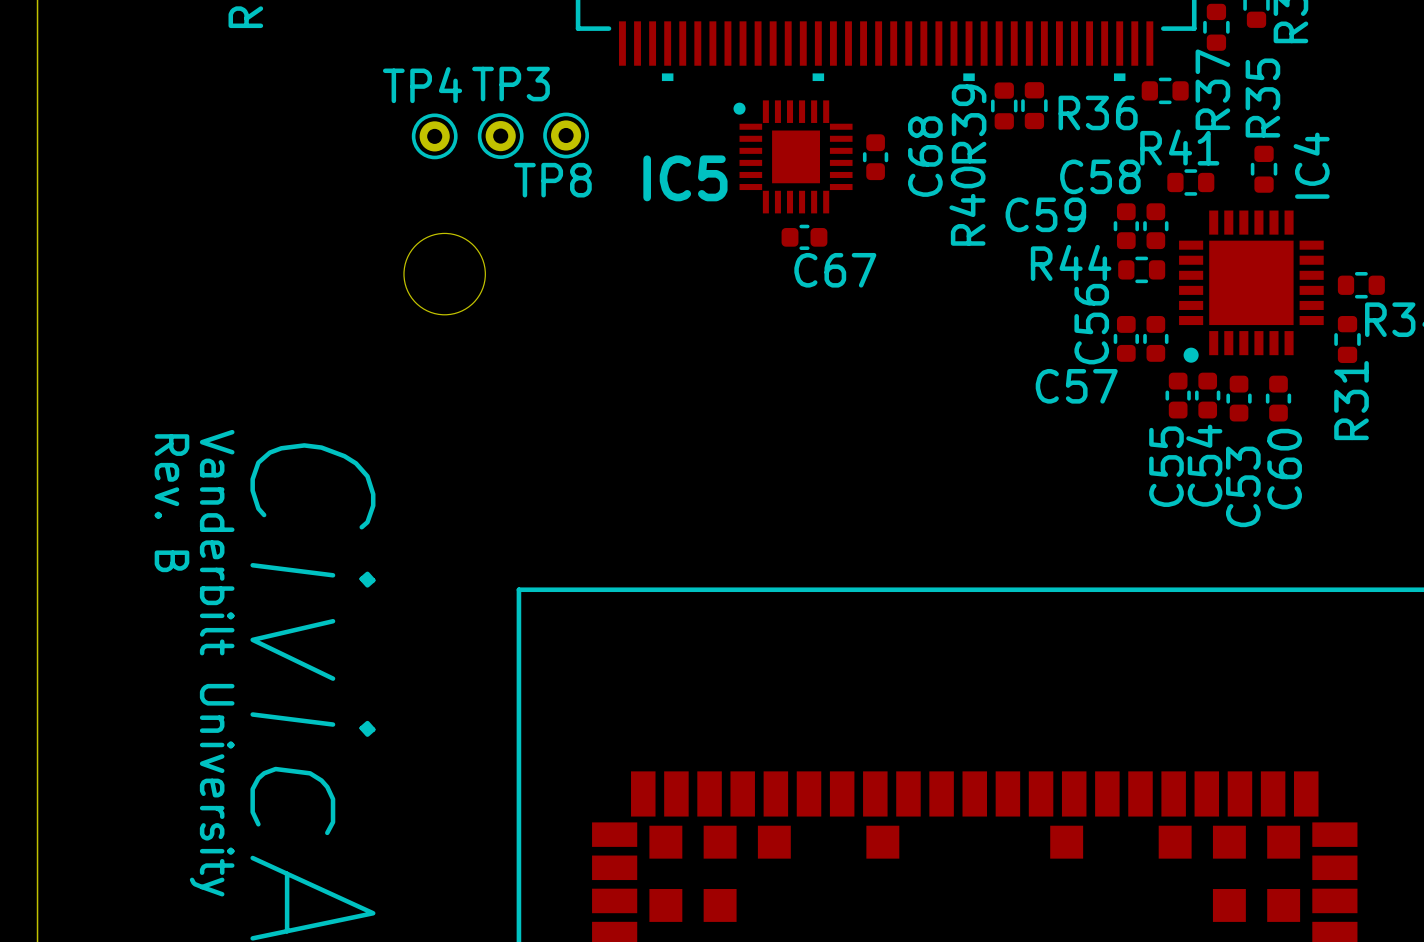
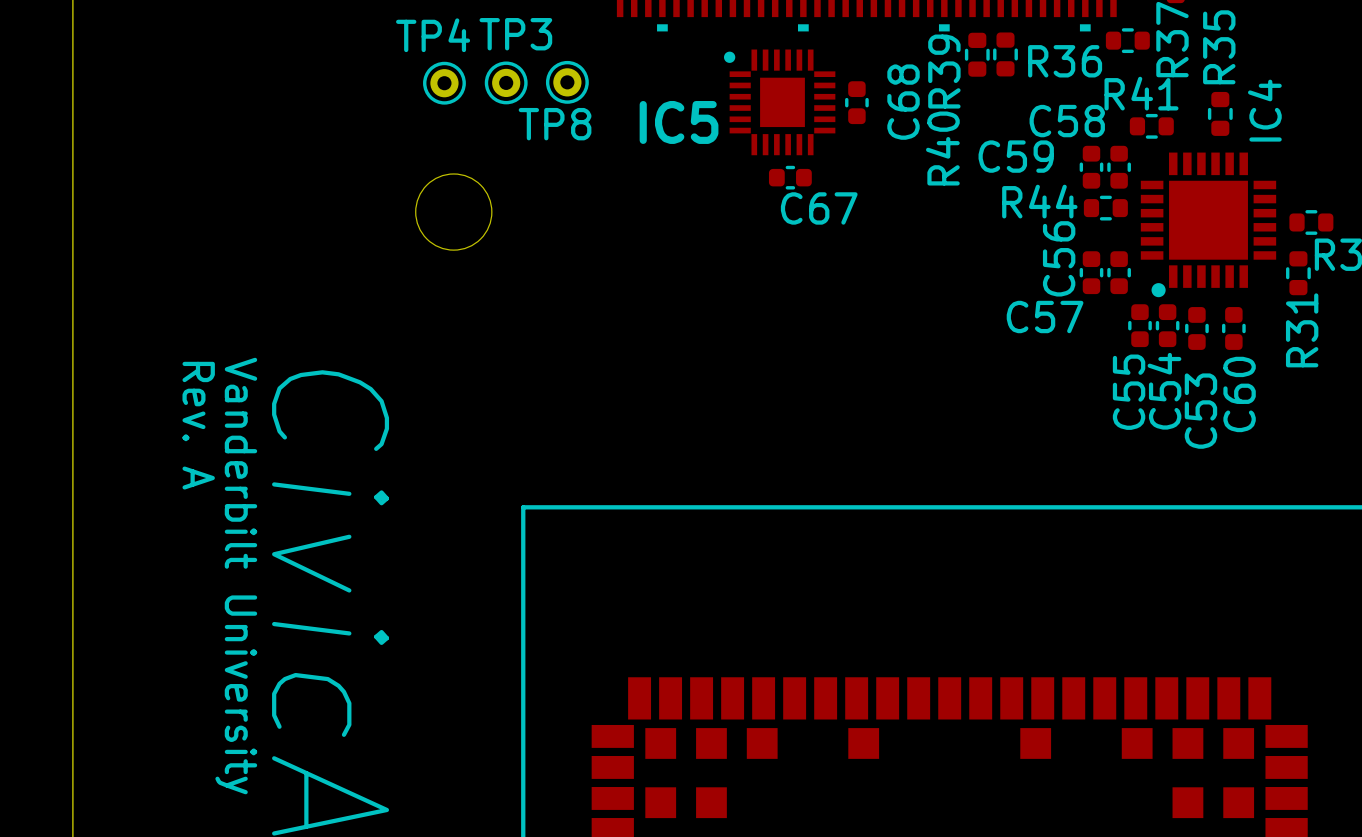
IC4 footprint: [1179, 210, 1324, 363] -> [1140, 152, 1277, 298]
text: Rev. B (171, 503) -> Rev. A (198, 425)

